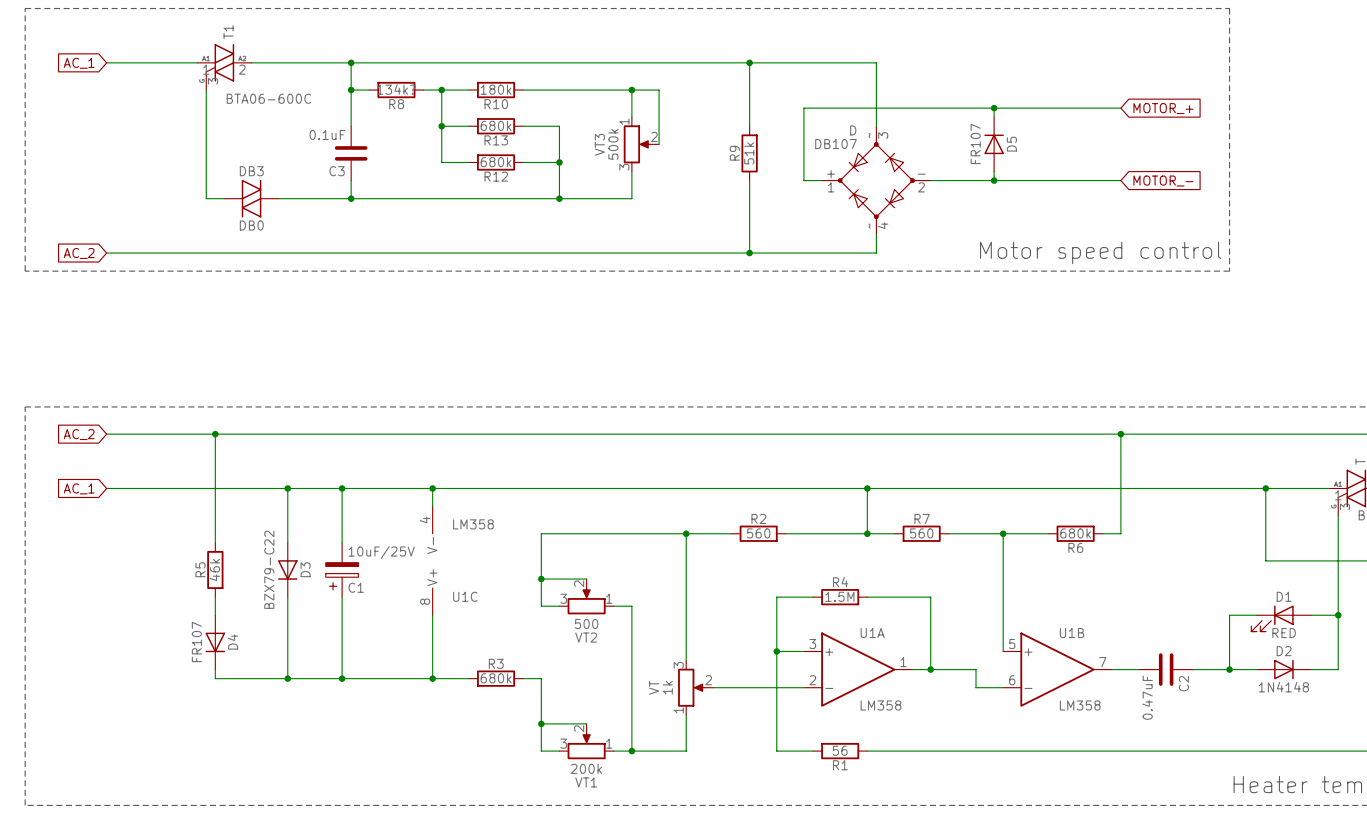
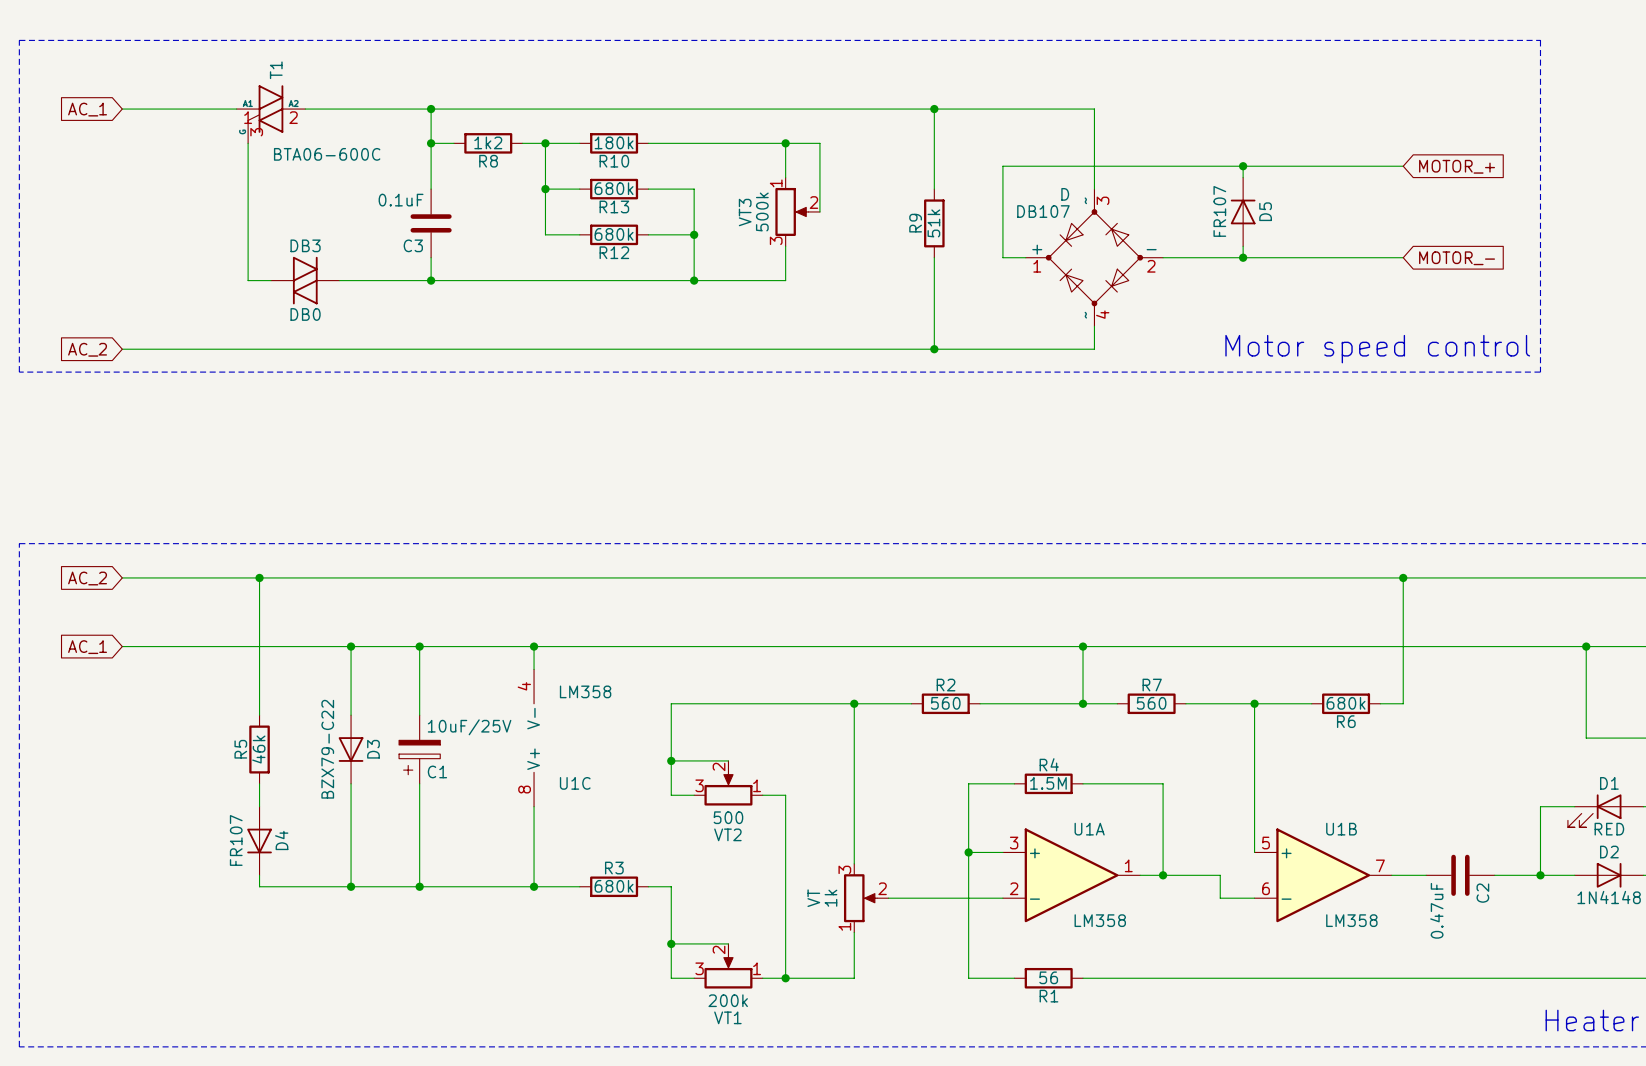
R8 value: 134k? (396, 89) -> 1k2 (488, 142)

